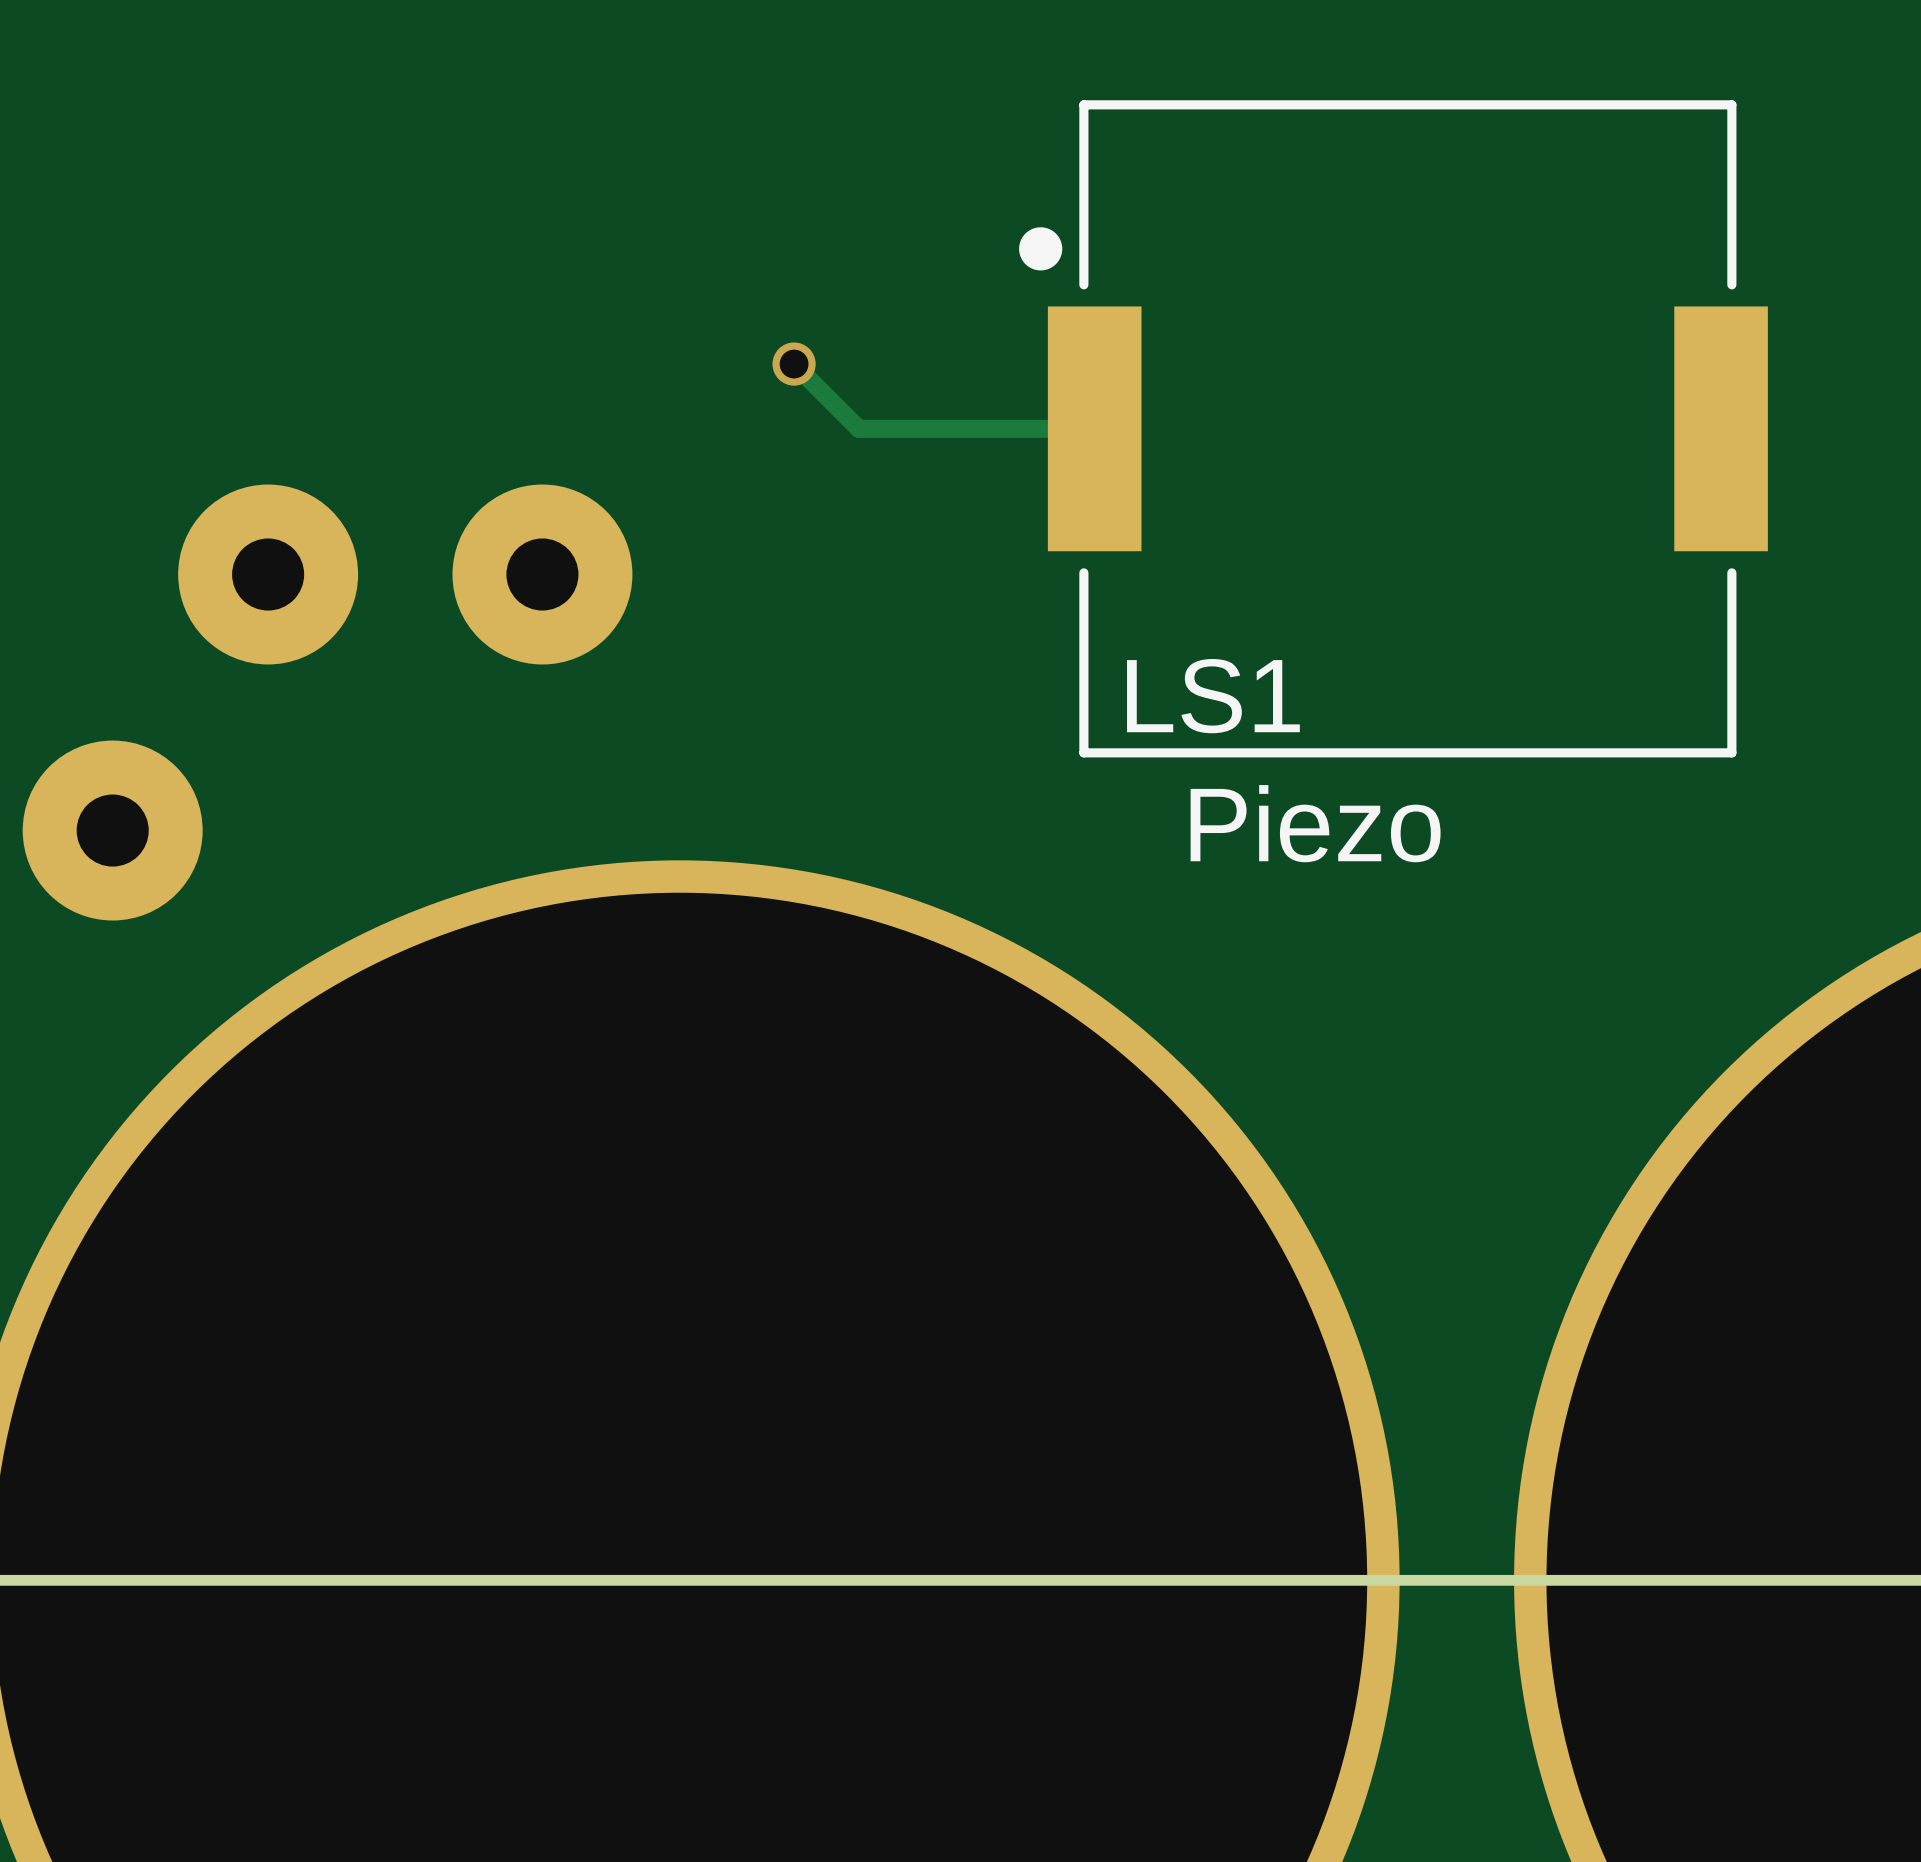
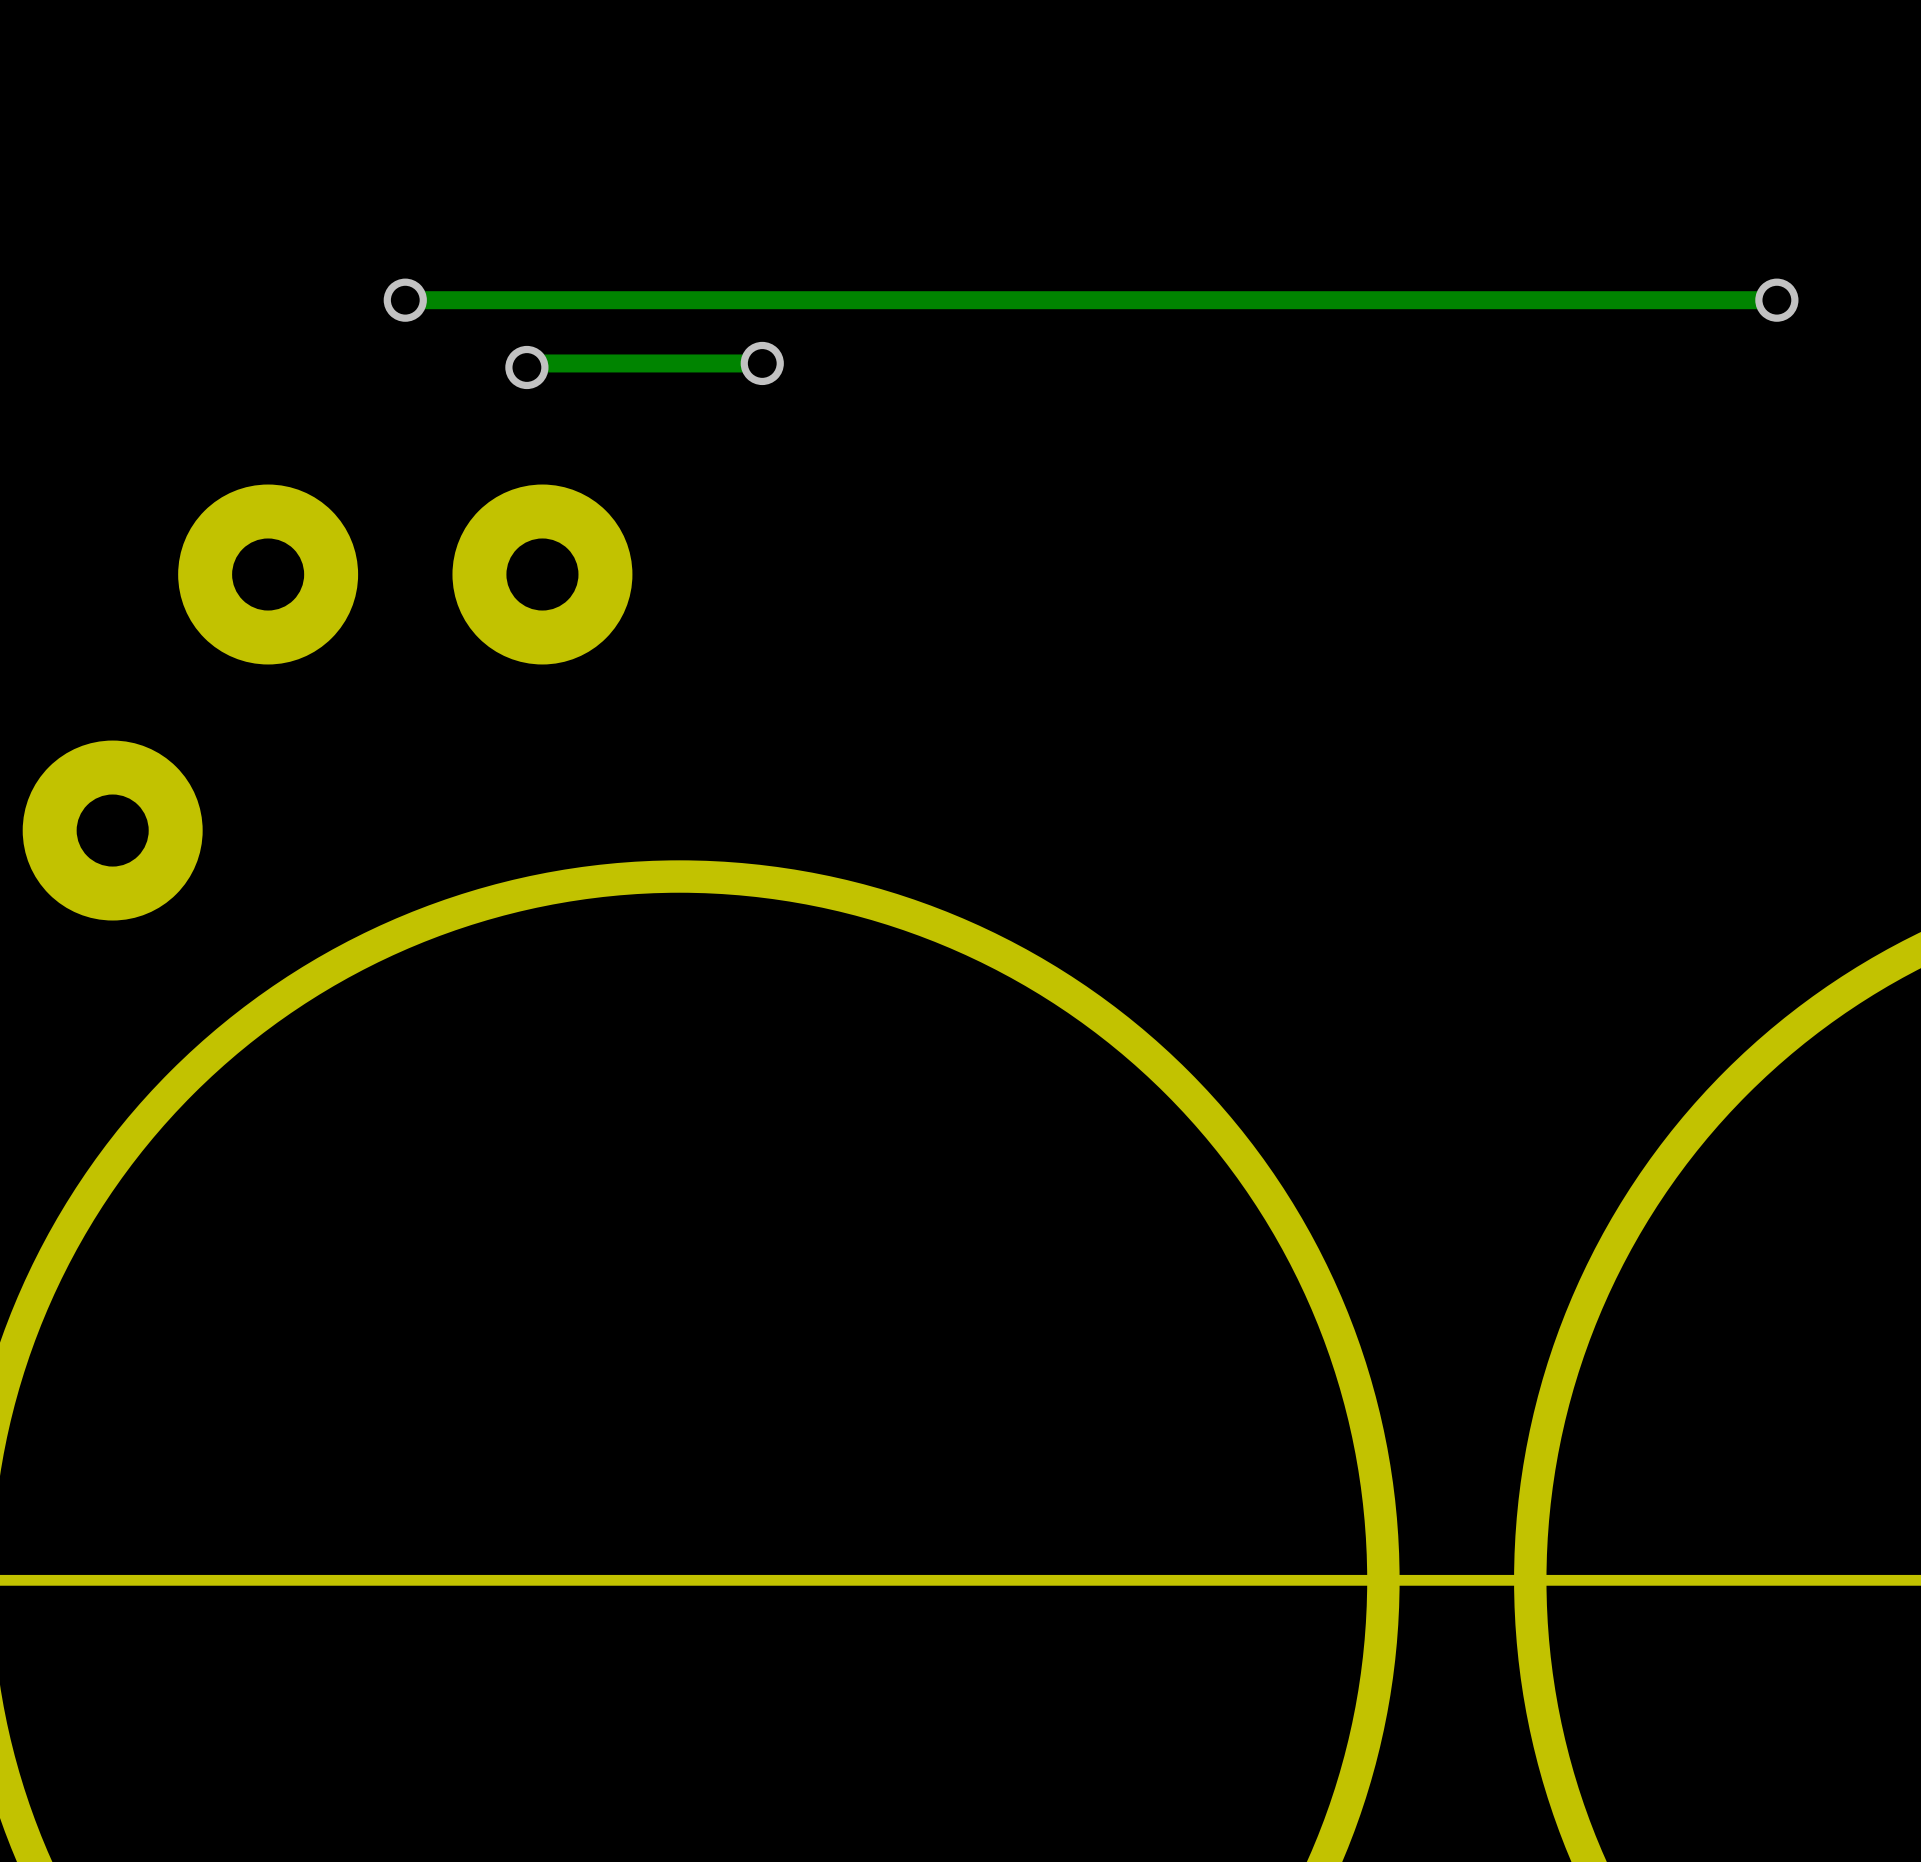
via: none -> (405, 300)
track: none -> (1776, 300) (405, 300)
via: none -> (1776, 300)
track: none -> (762, 363) (530, 363) (526, 367)
track: (794, 364) (858, 428) (1094, 428) -> none
via position: (794, 364) -> (762, 363)
via: none -> (526, 367)
LS1: Piezo (1393, 428) -> none

